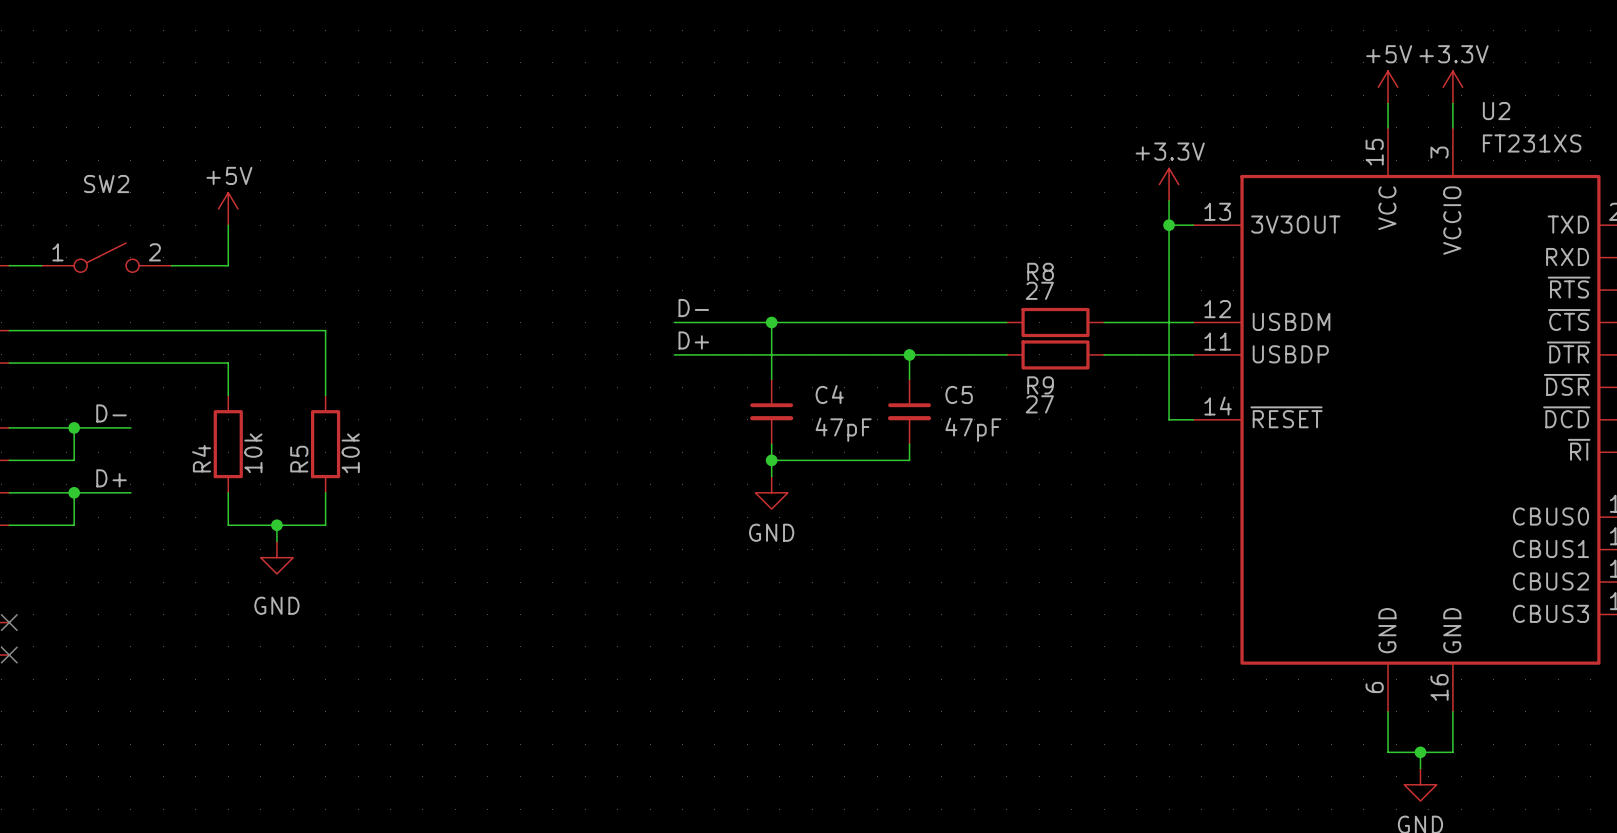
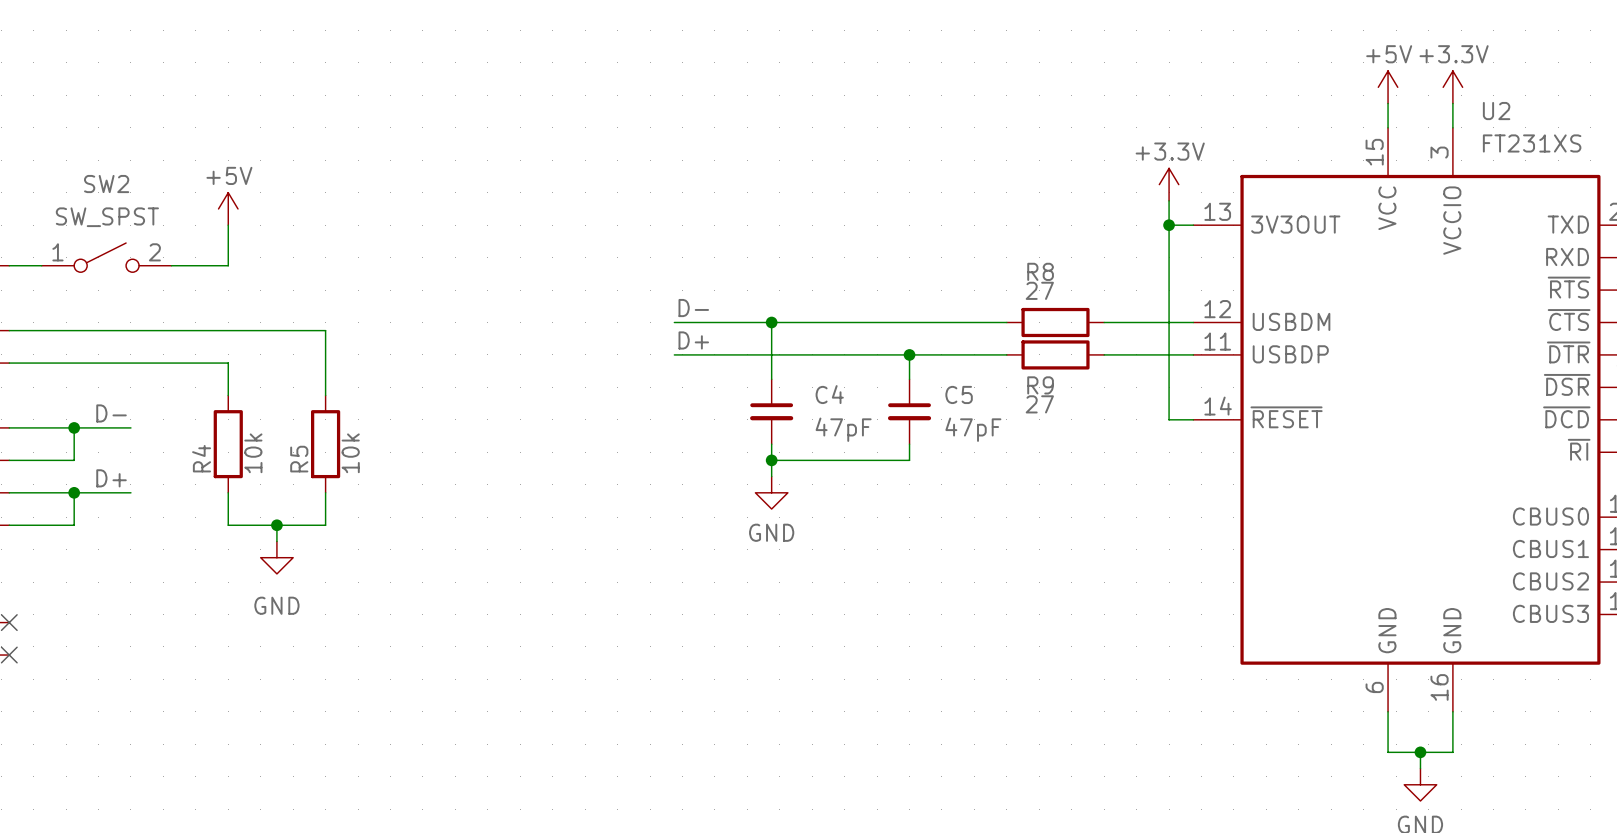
SW2 value: none -> SW_SPST (107, 217)

